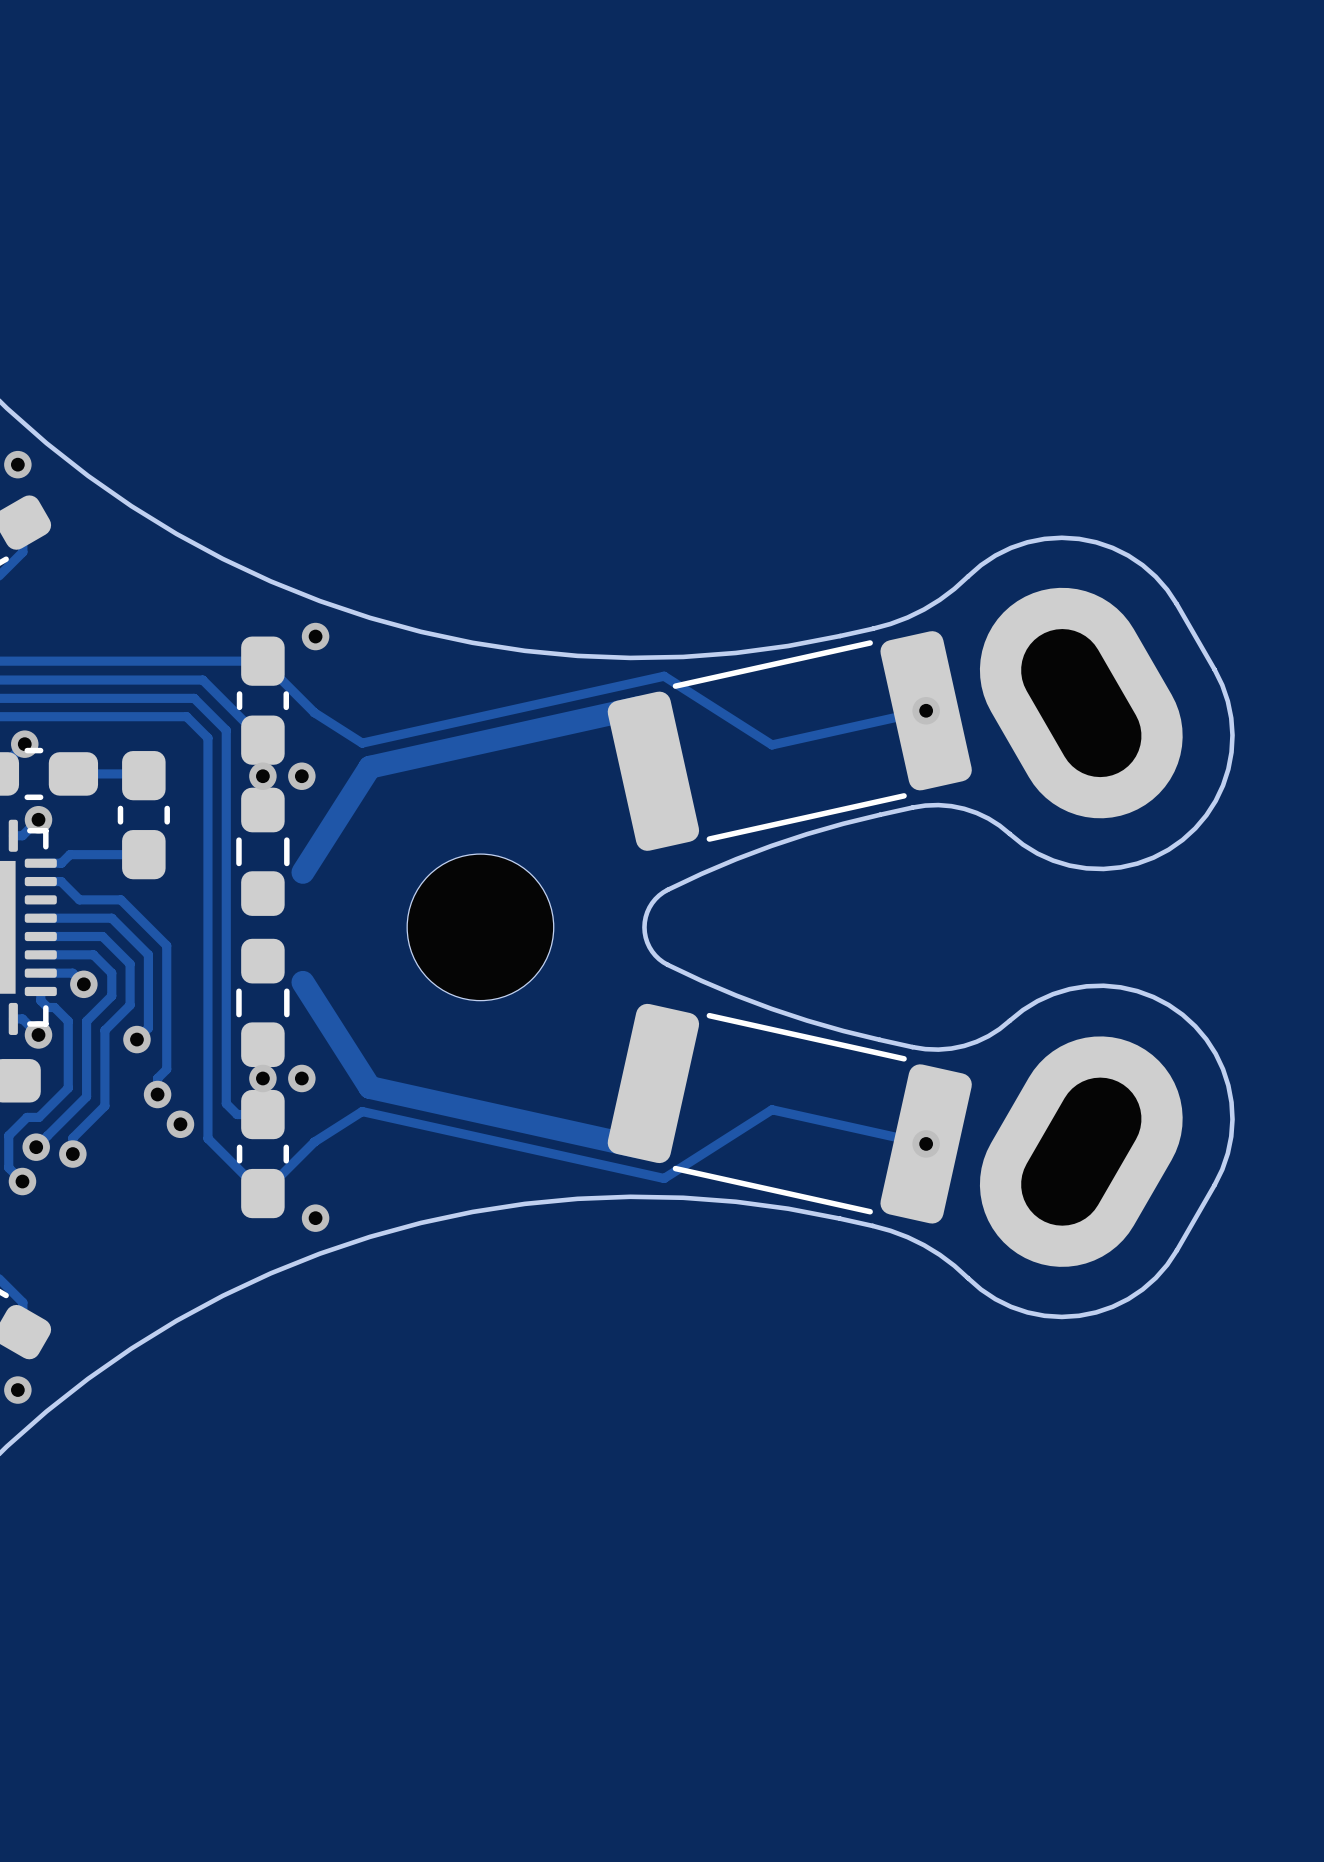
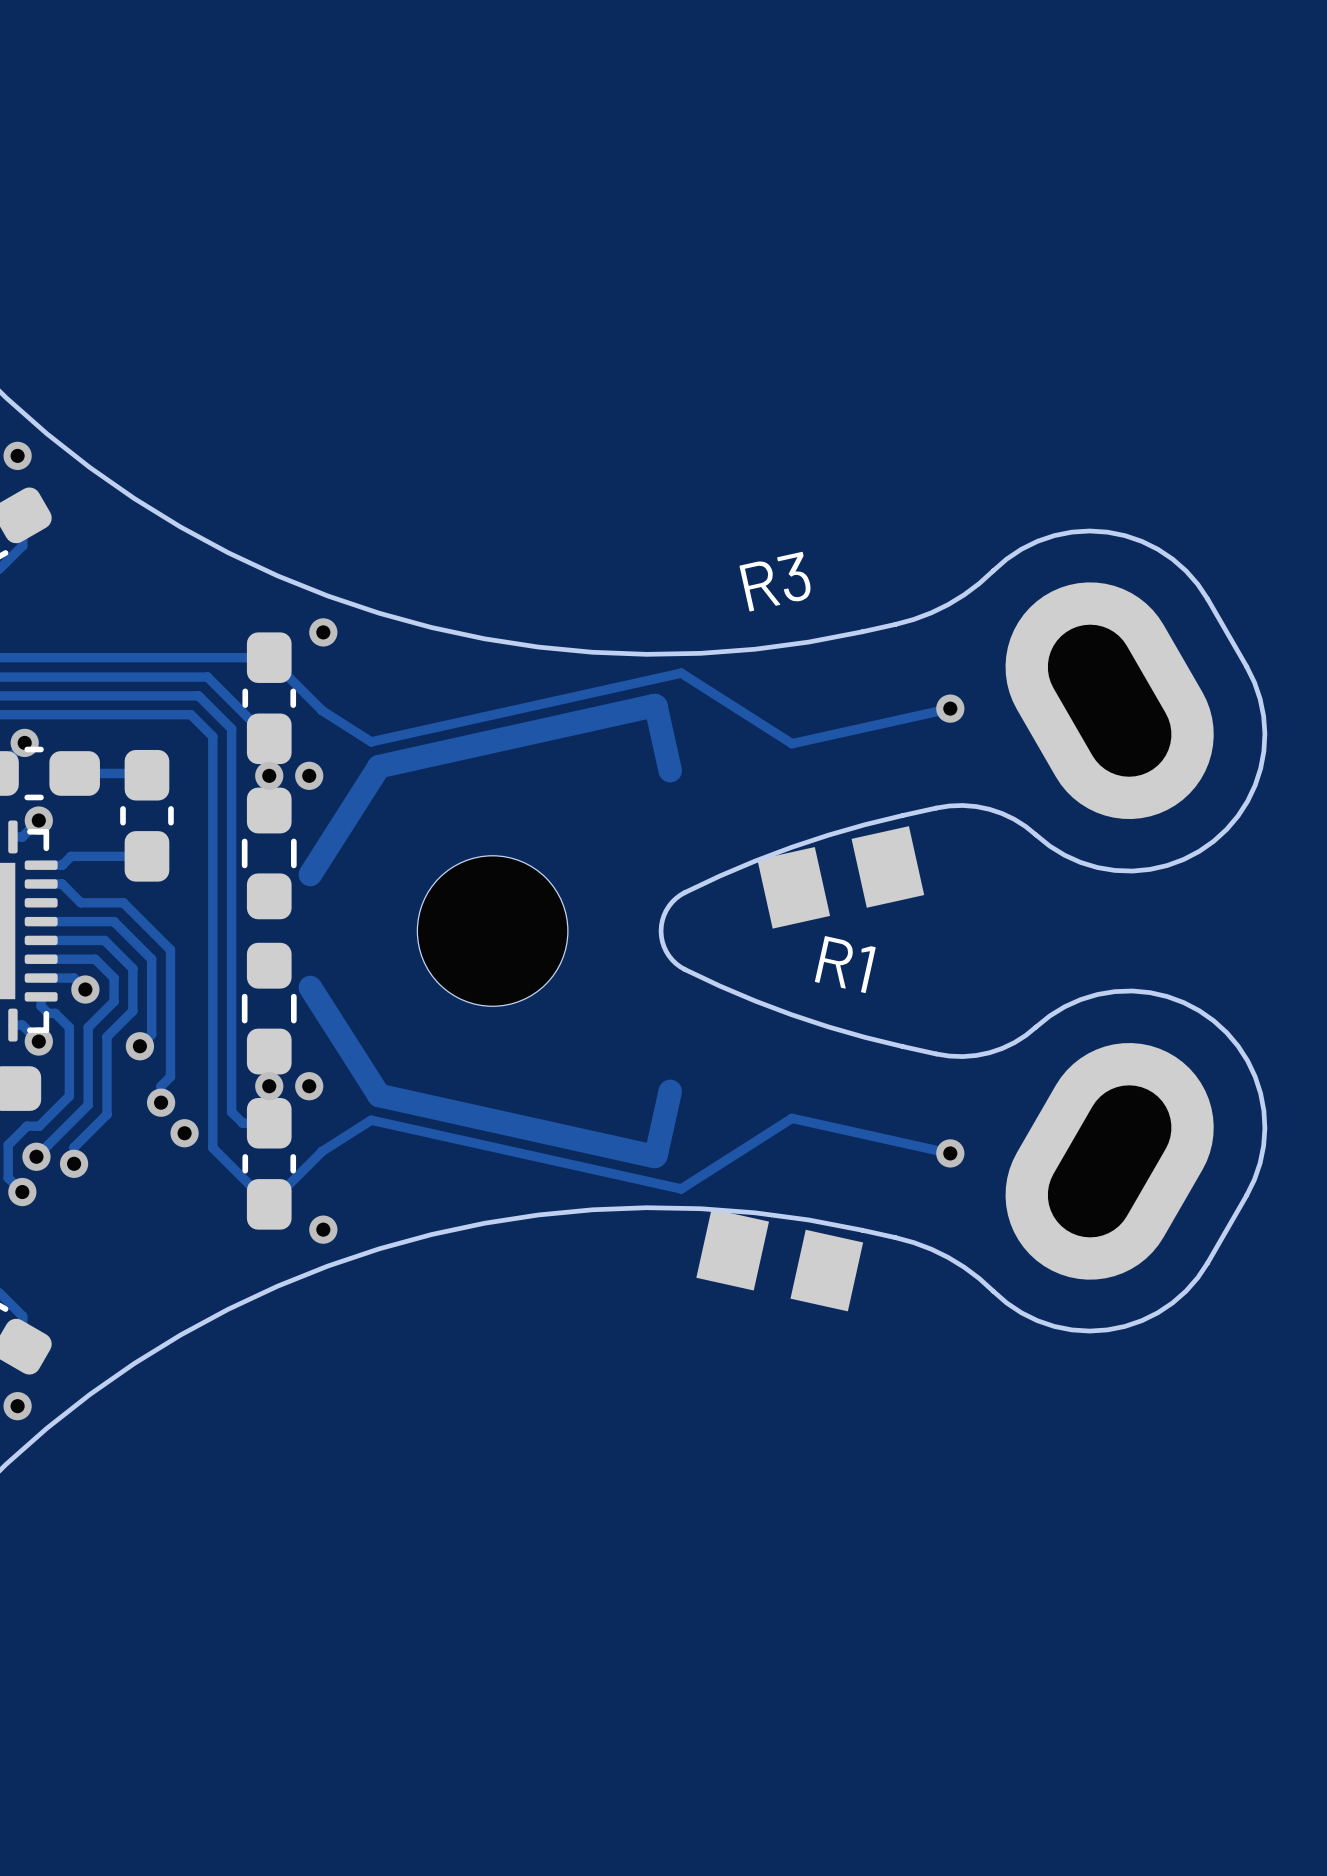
part: (789, 741) -> none
R3: none -> (840, 877)
part: (789, 1113) -> none
R1: none -> (779, 1260)

